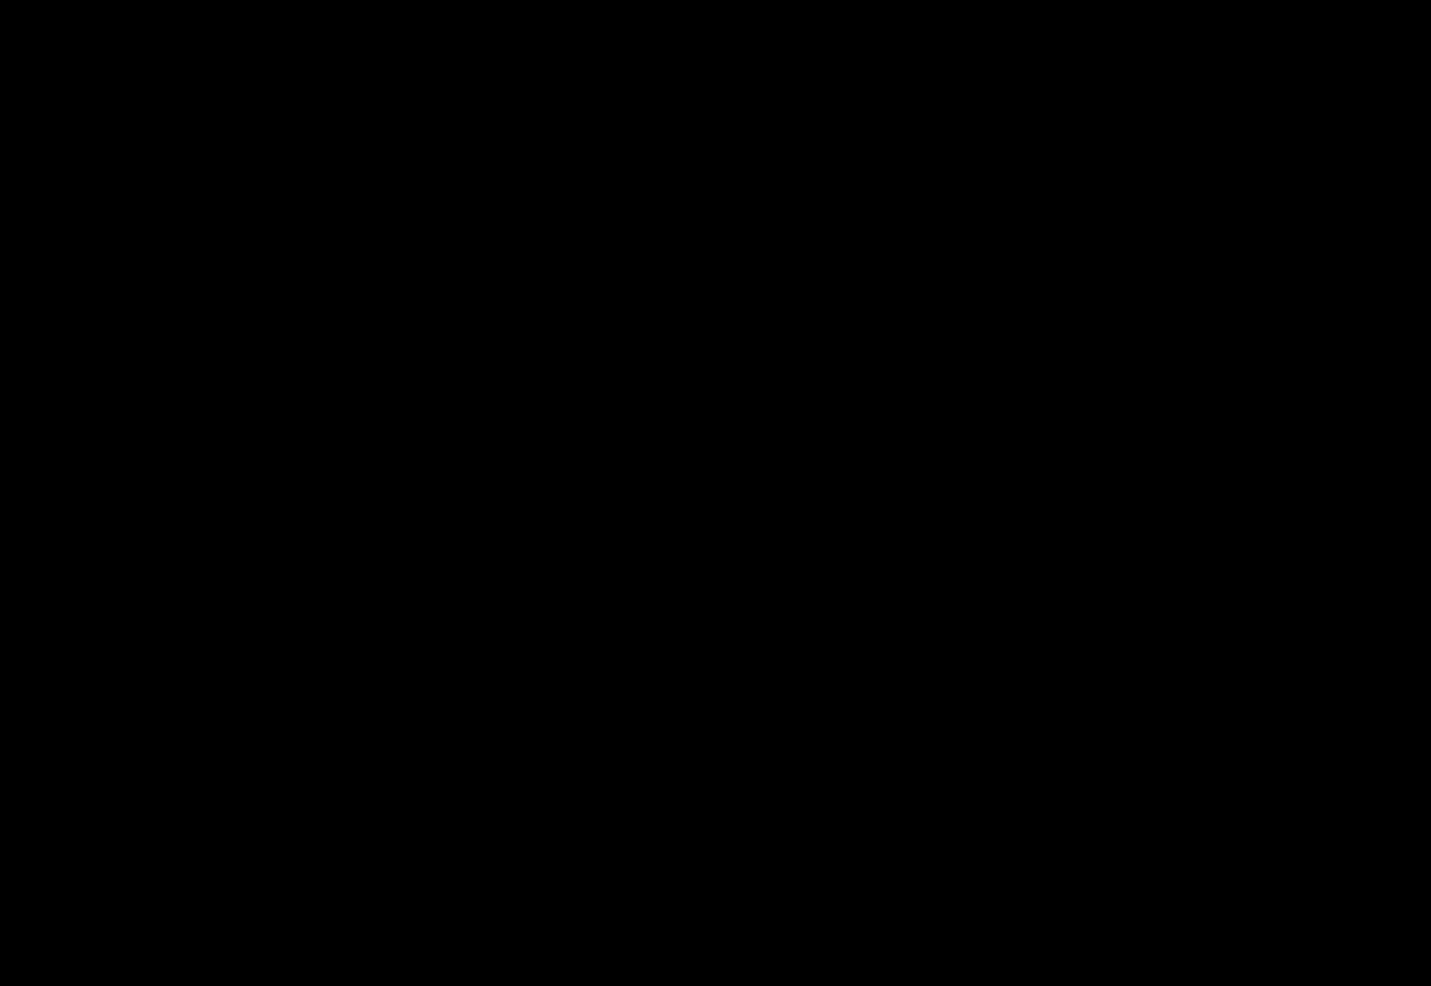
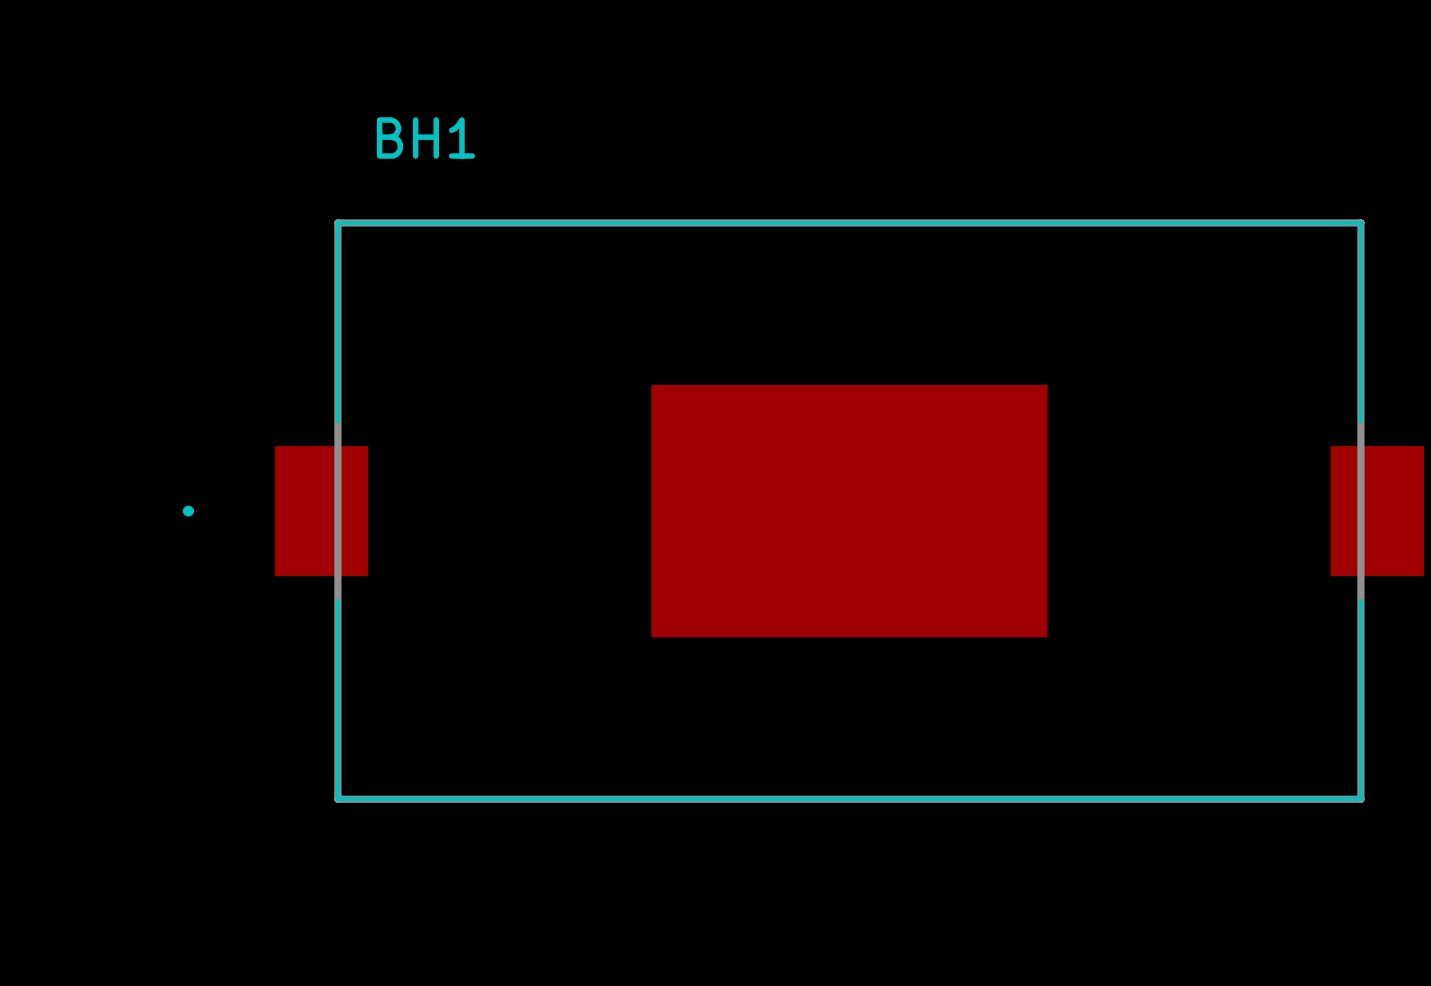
BH1: none -> (803, 511)

